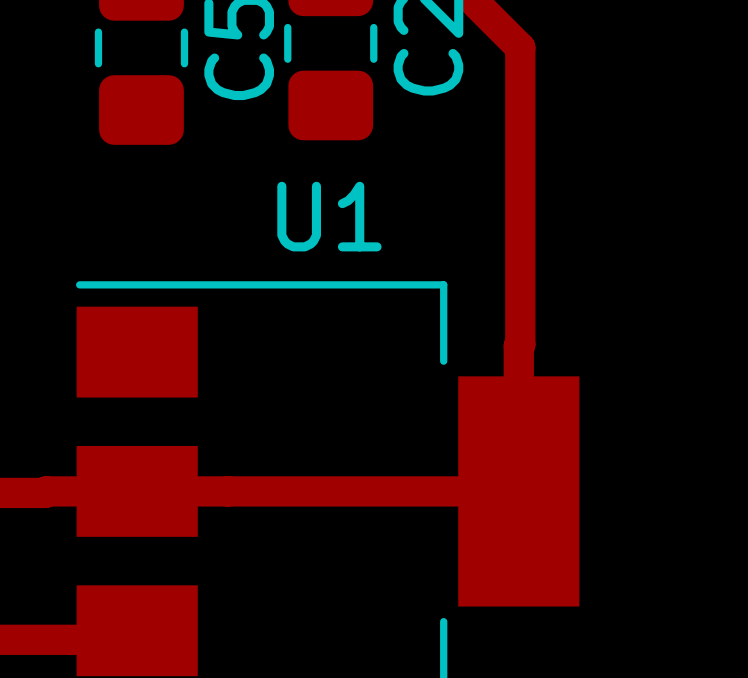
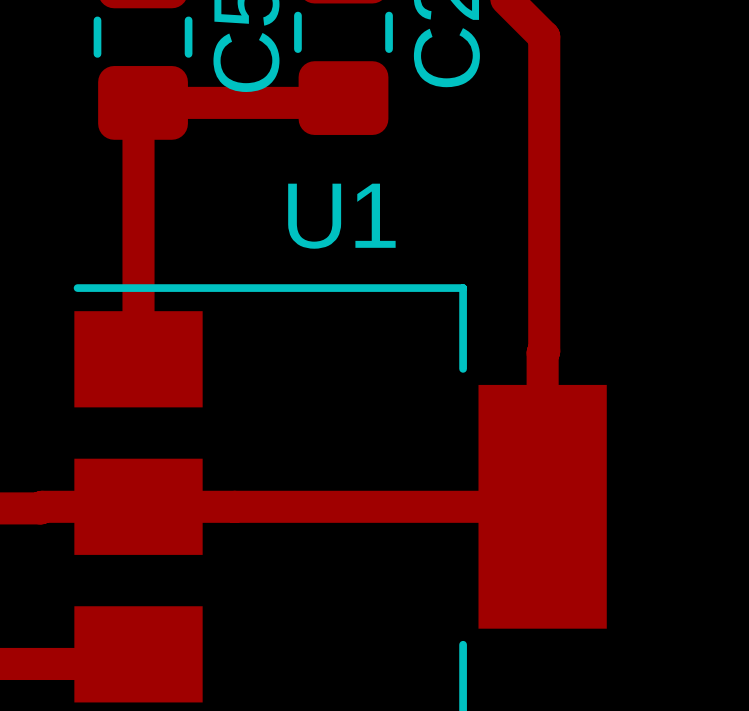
top track: none -> (343, 98) (338, 102) (143, 102) (138, 107) (138, 359)

